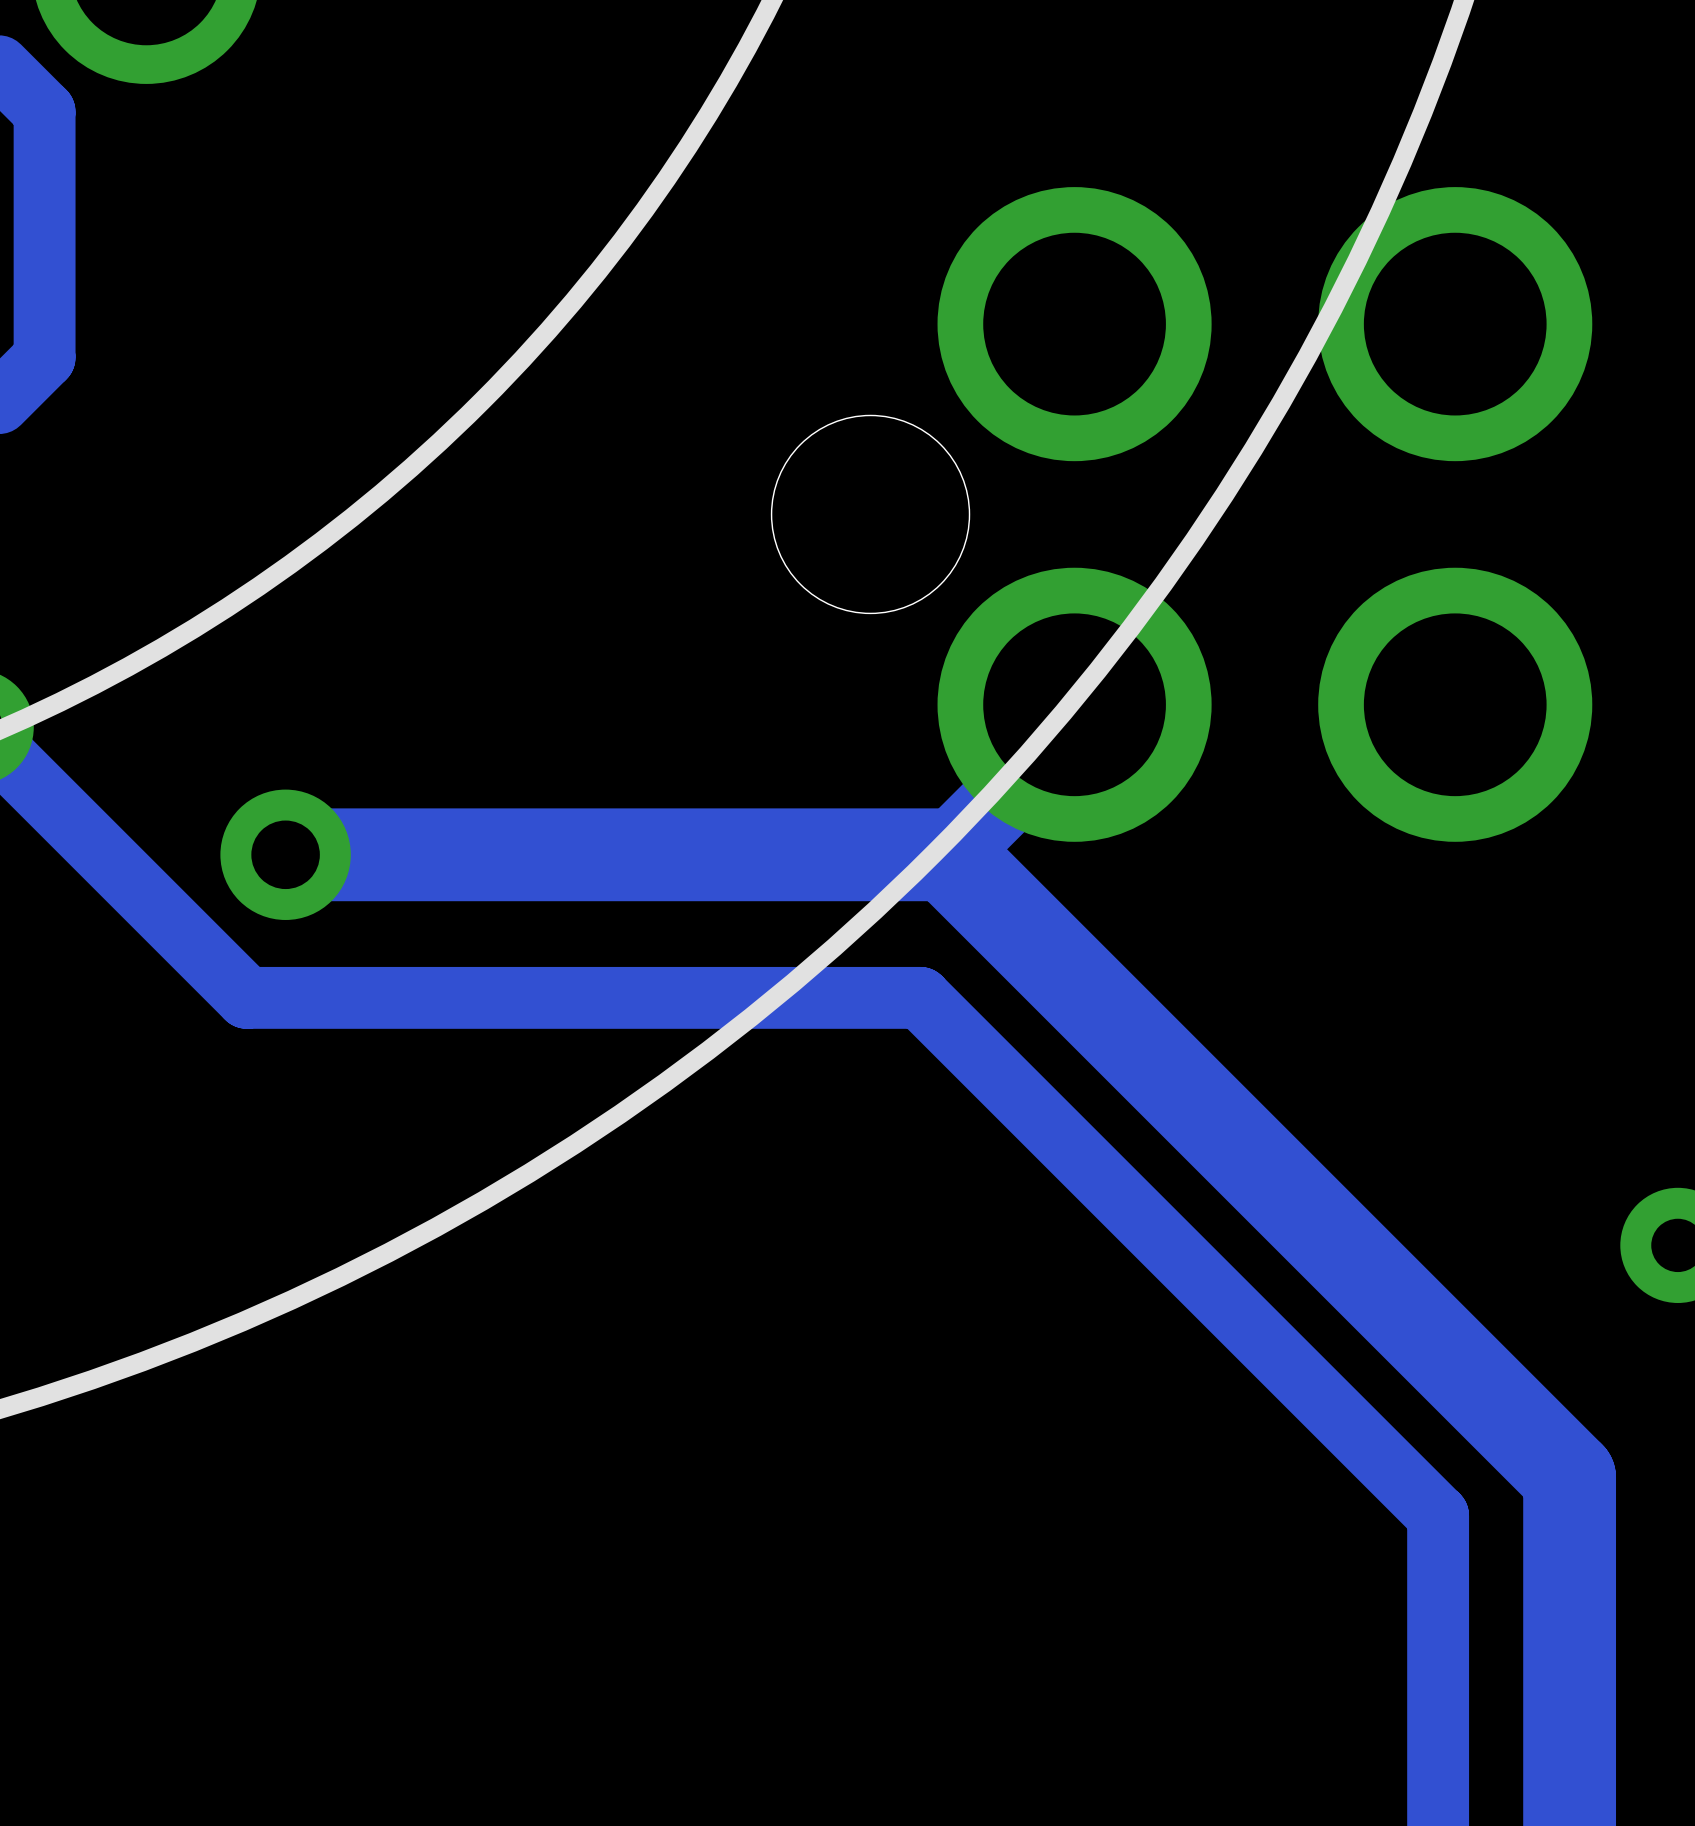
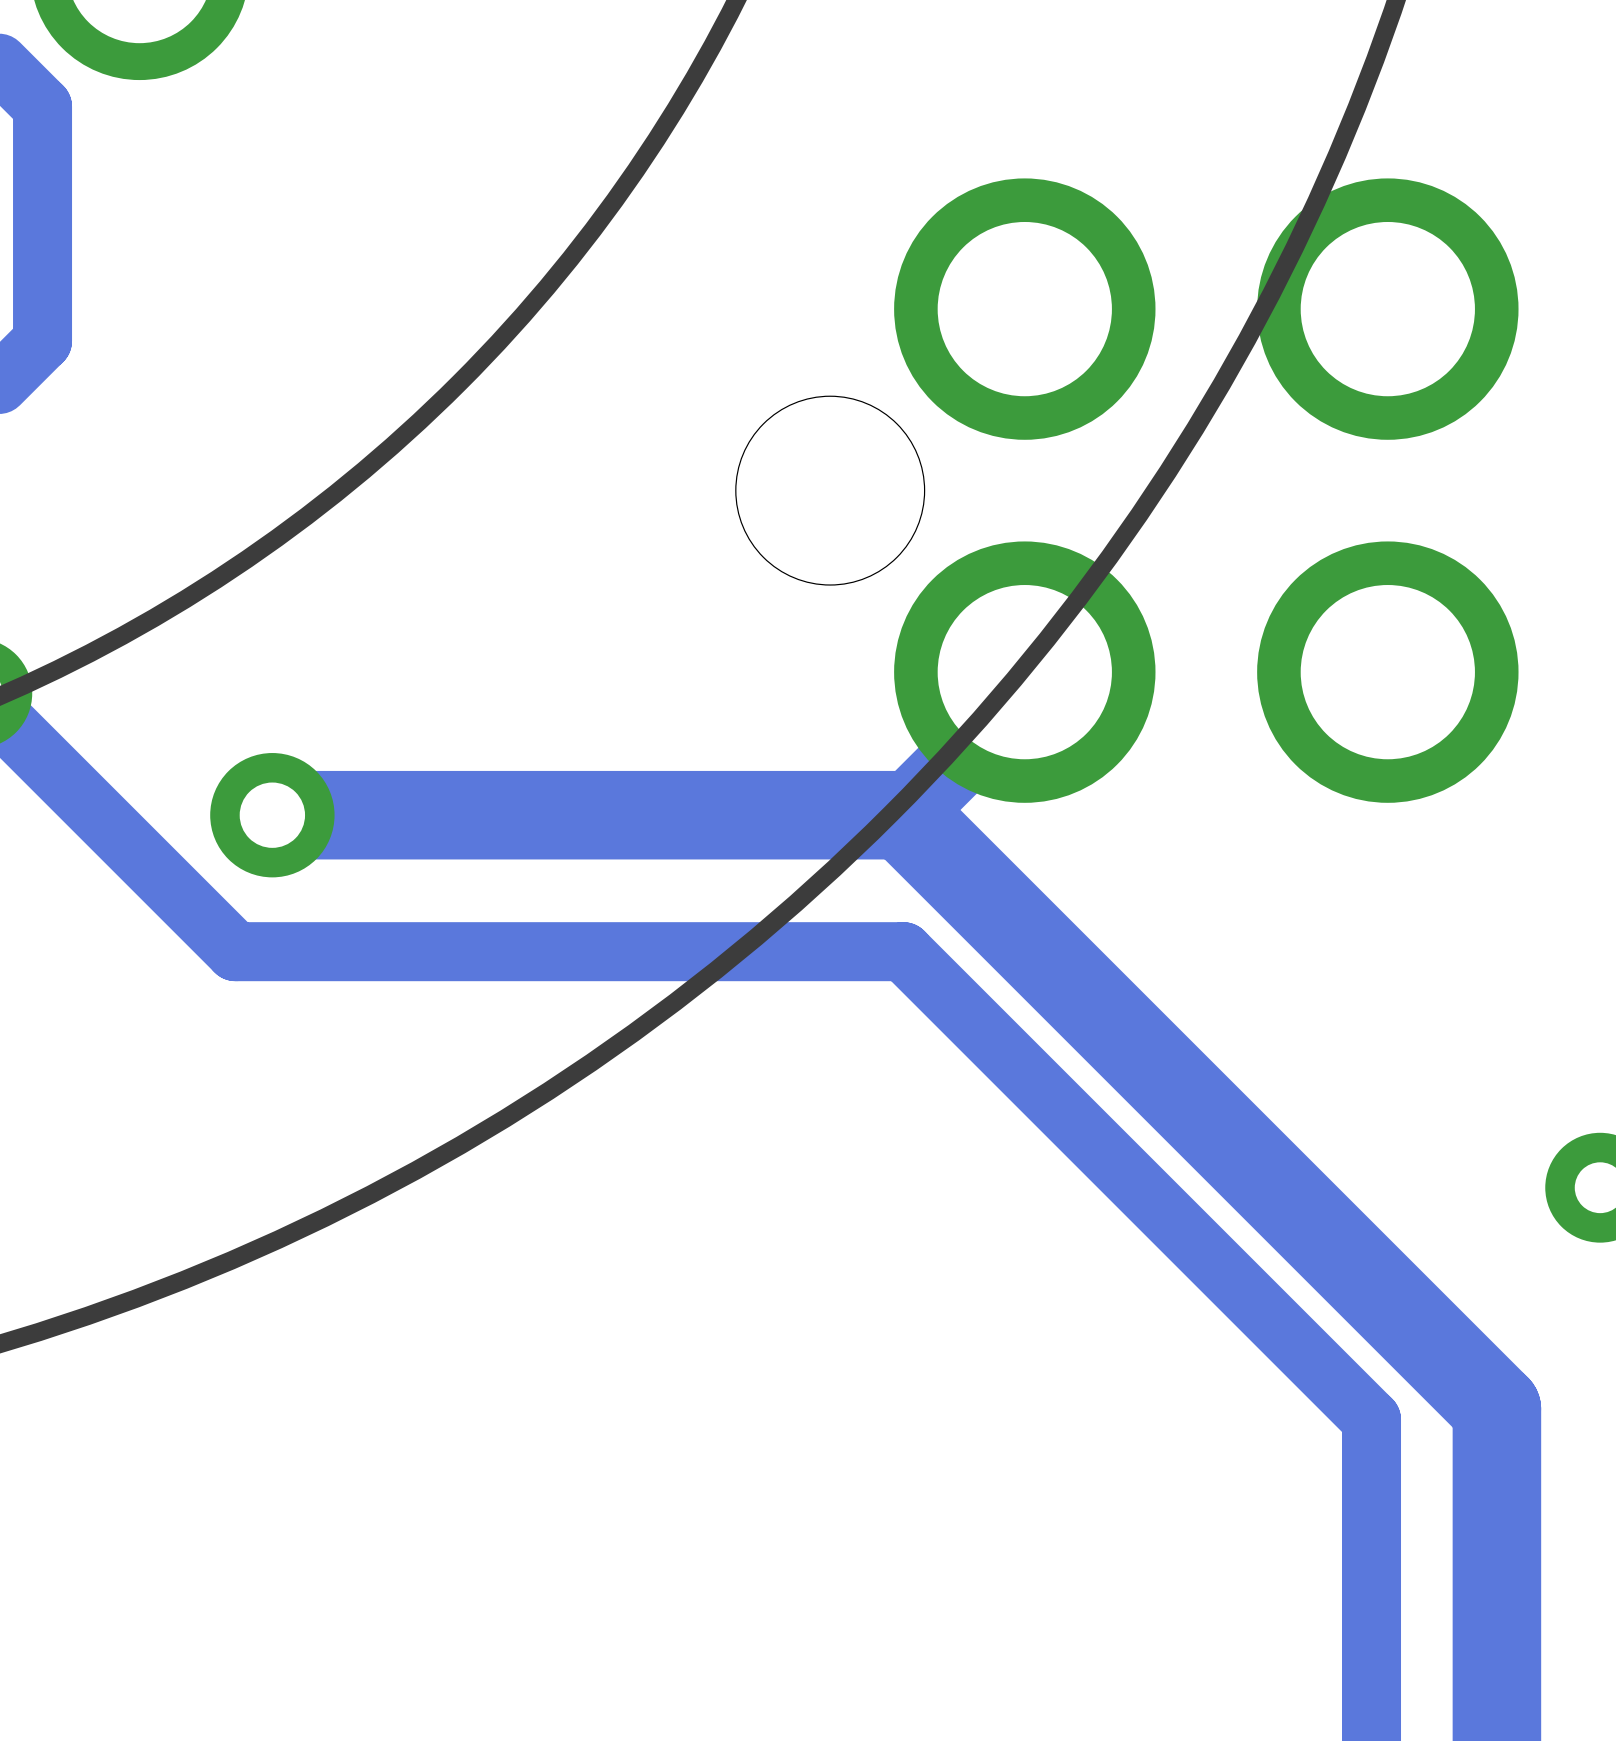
track: (920, 997) (1438, 1515) -> (877, 951) (903, 951) (1371, 1419) (1371, 1445)

